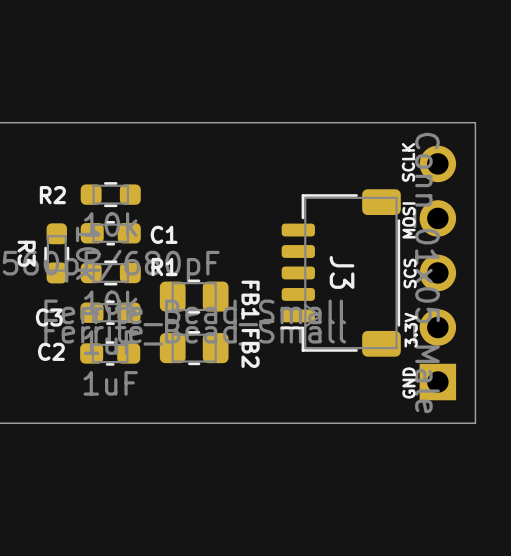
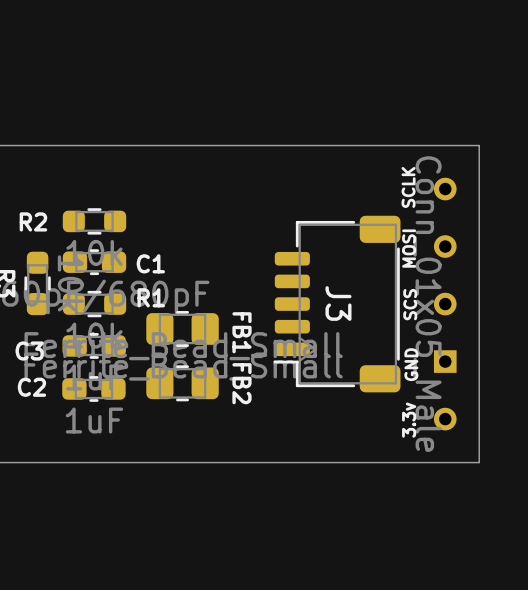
part footprint: [419, 145, 457, 401] -> [433, 177, 457, 431]
text: 3.3V (411, 330) -> GND (411, 364)
text: GND (409, 382) -> 3.3v (409, 420)

